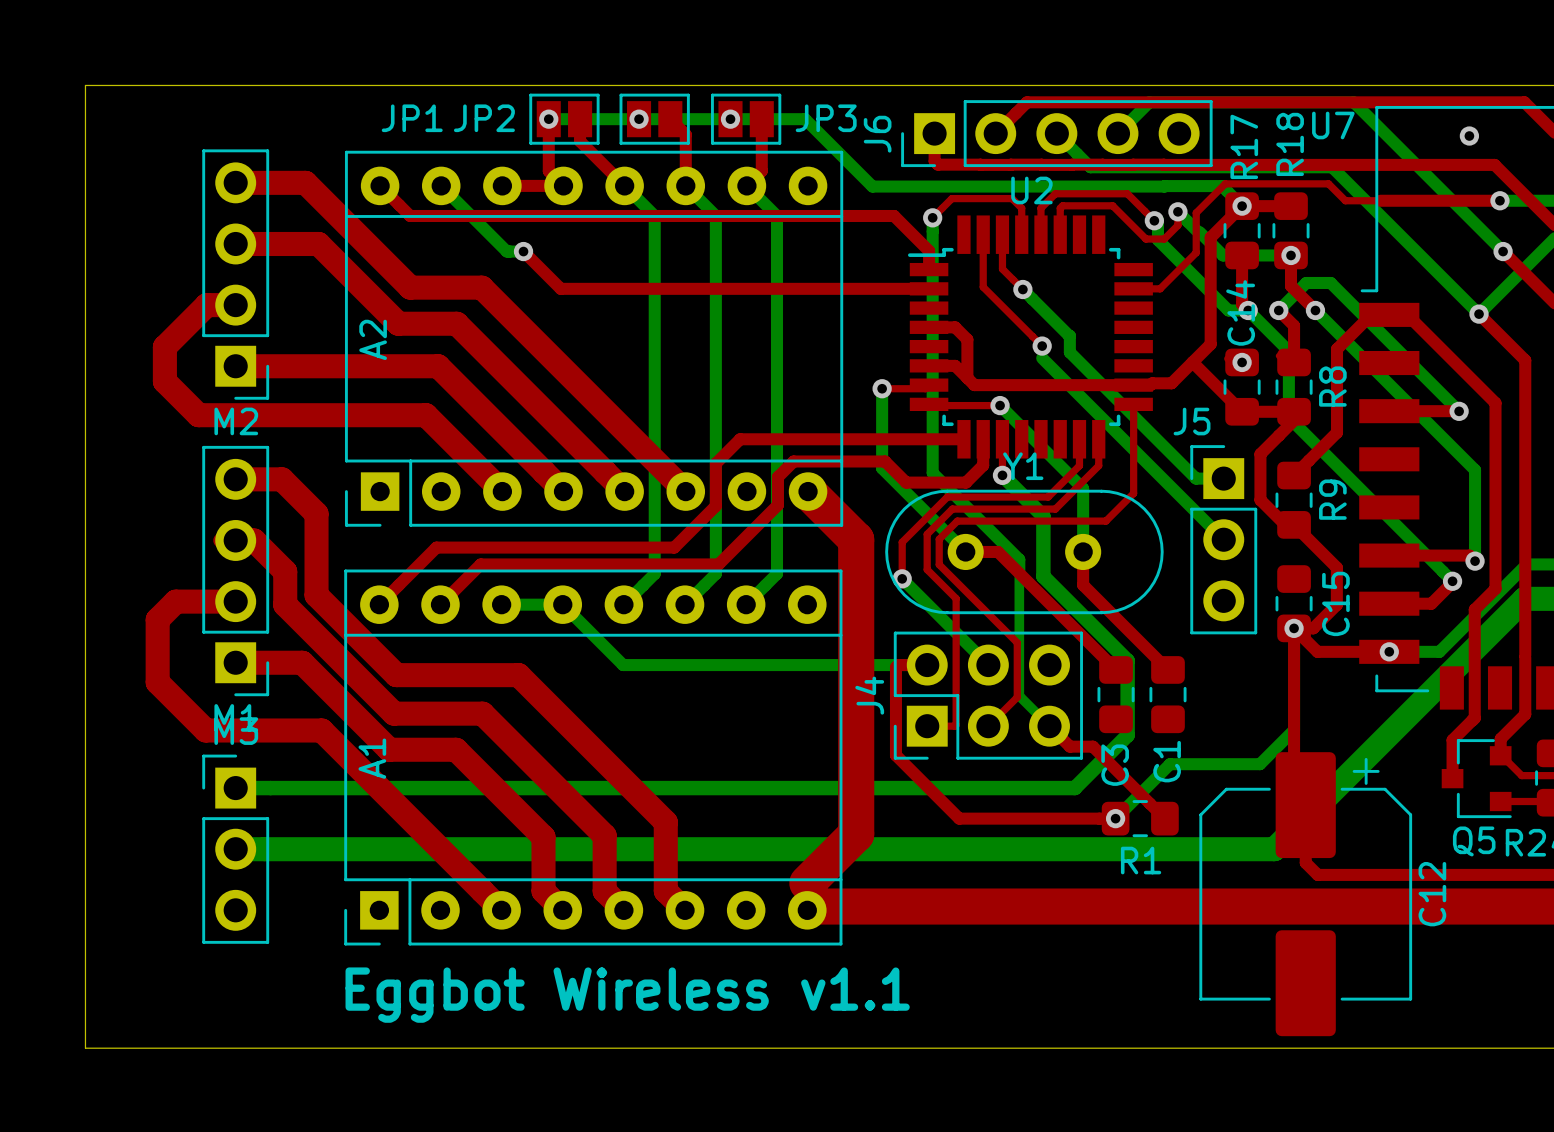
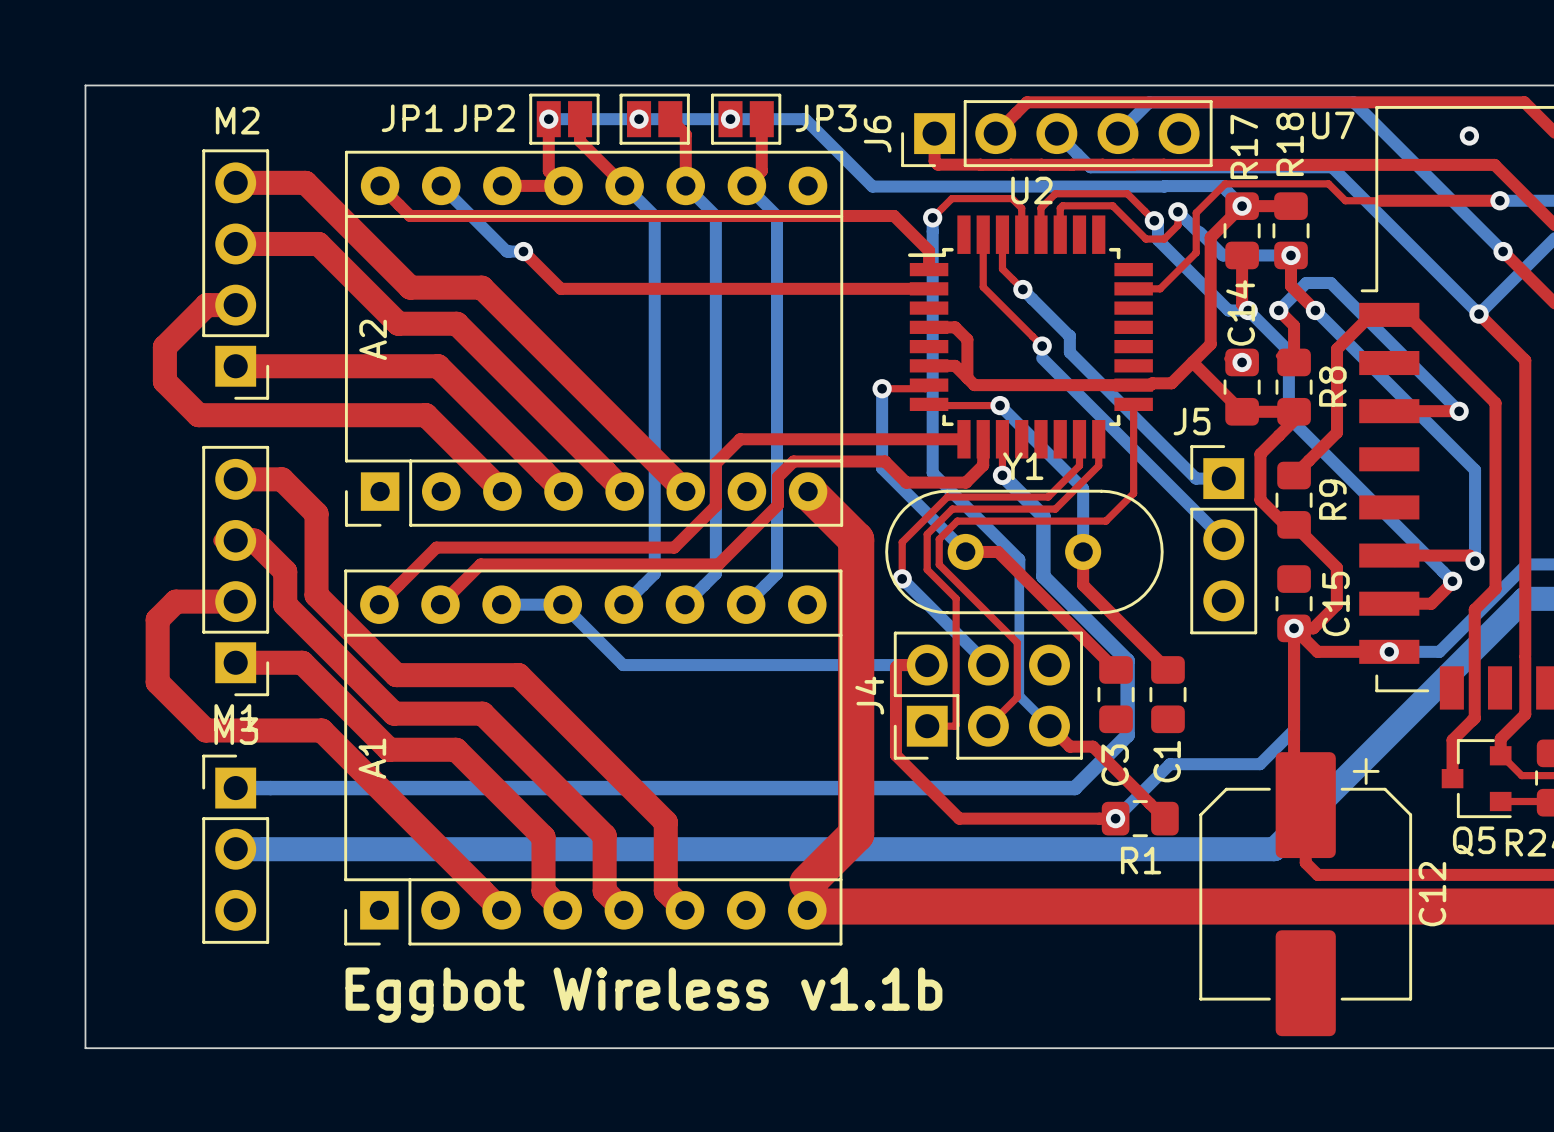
M2 name position: M2 (236, 421) -> M2 (237, 120)
text: Eggbot Wireless v1.1 (627, 995) -> Eggbot Wireless v1.1b (643, 995)

